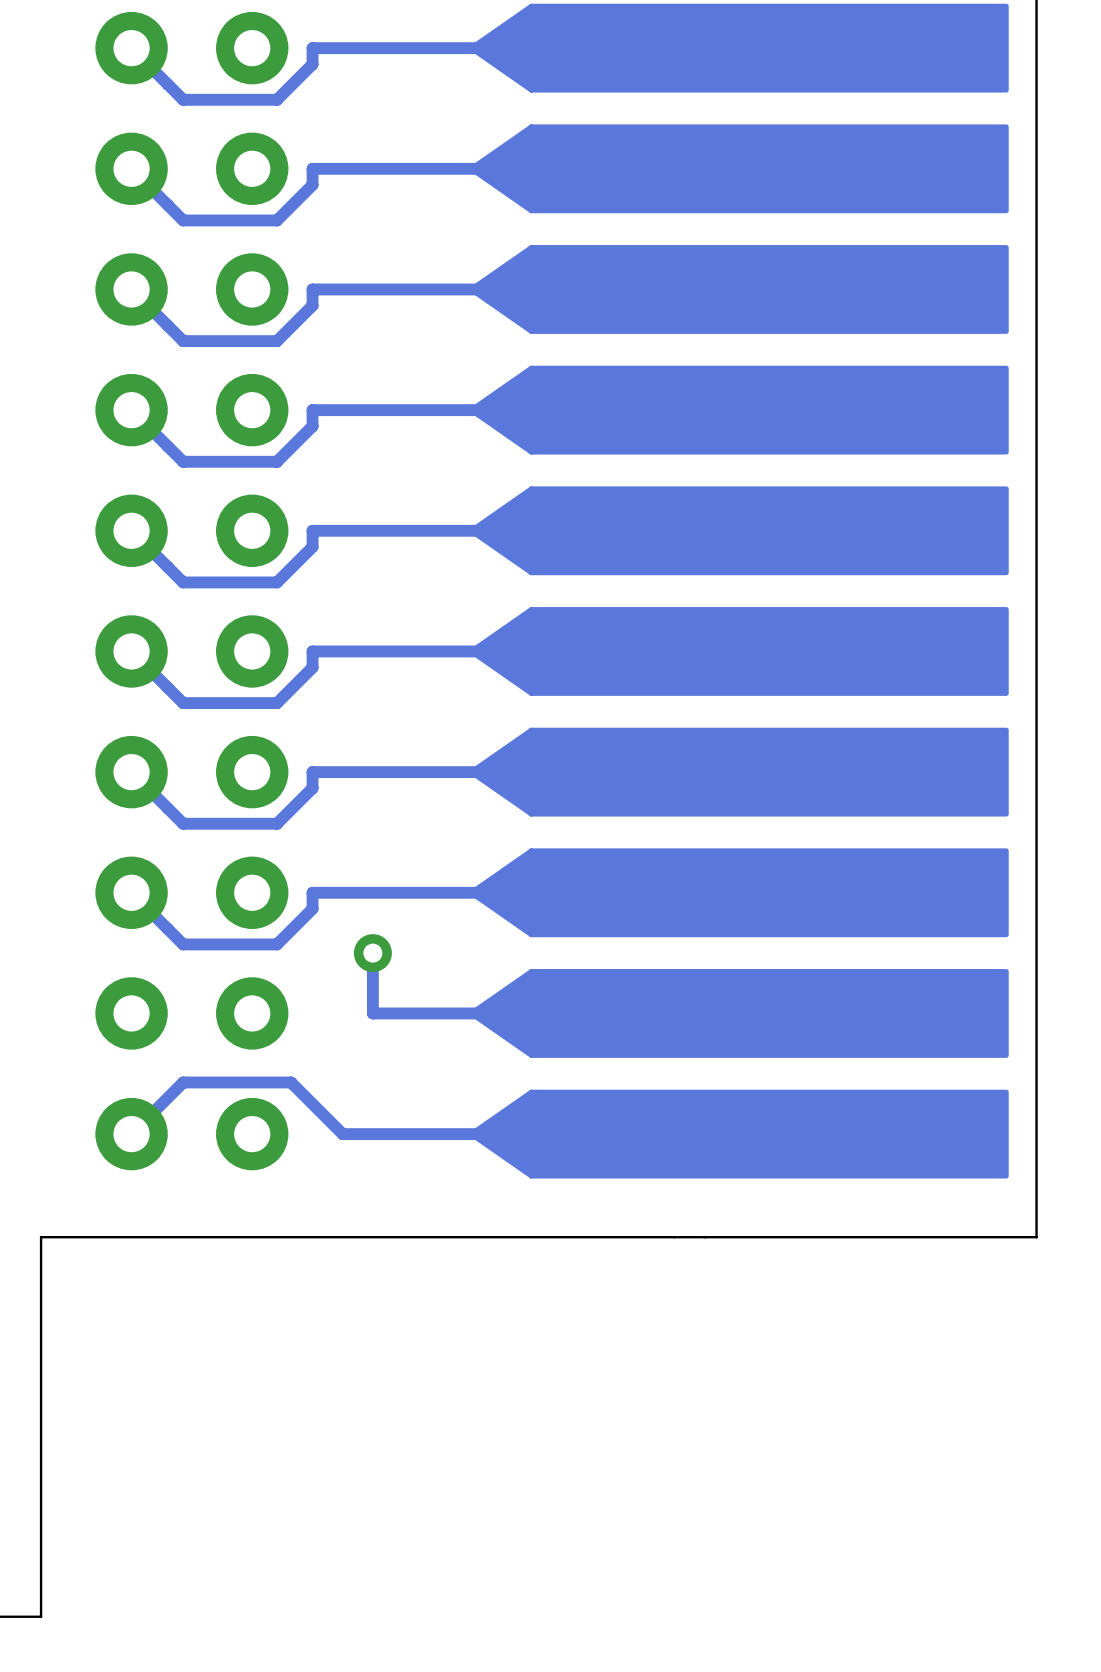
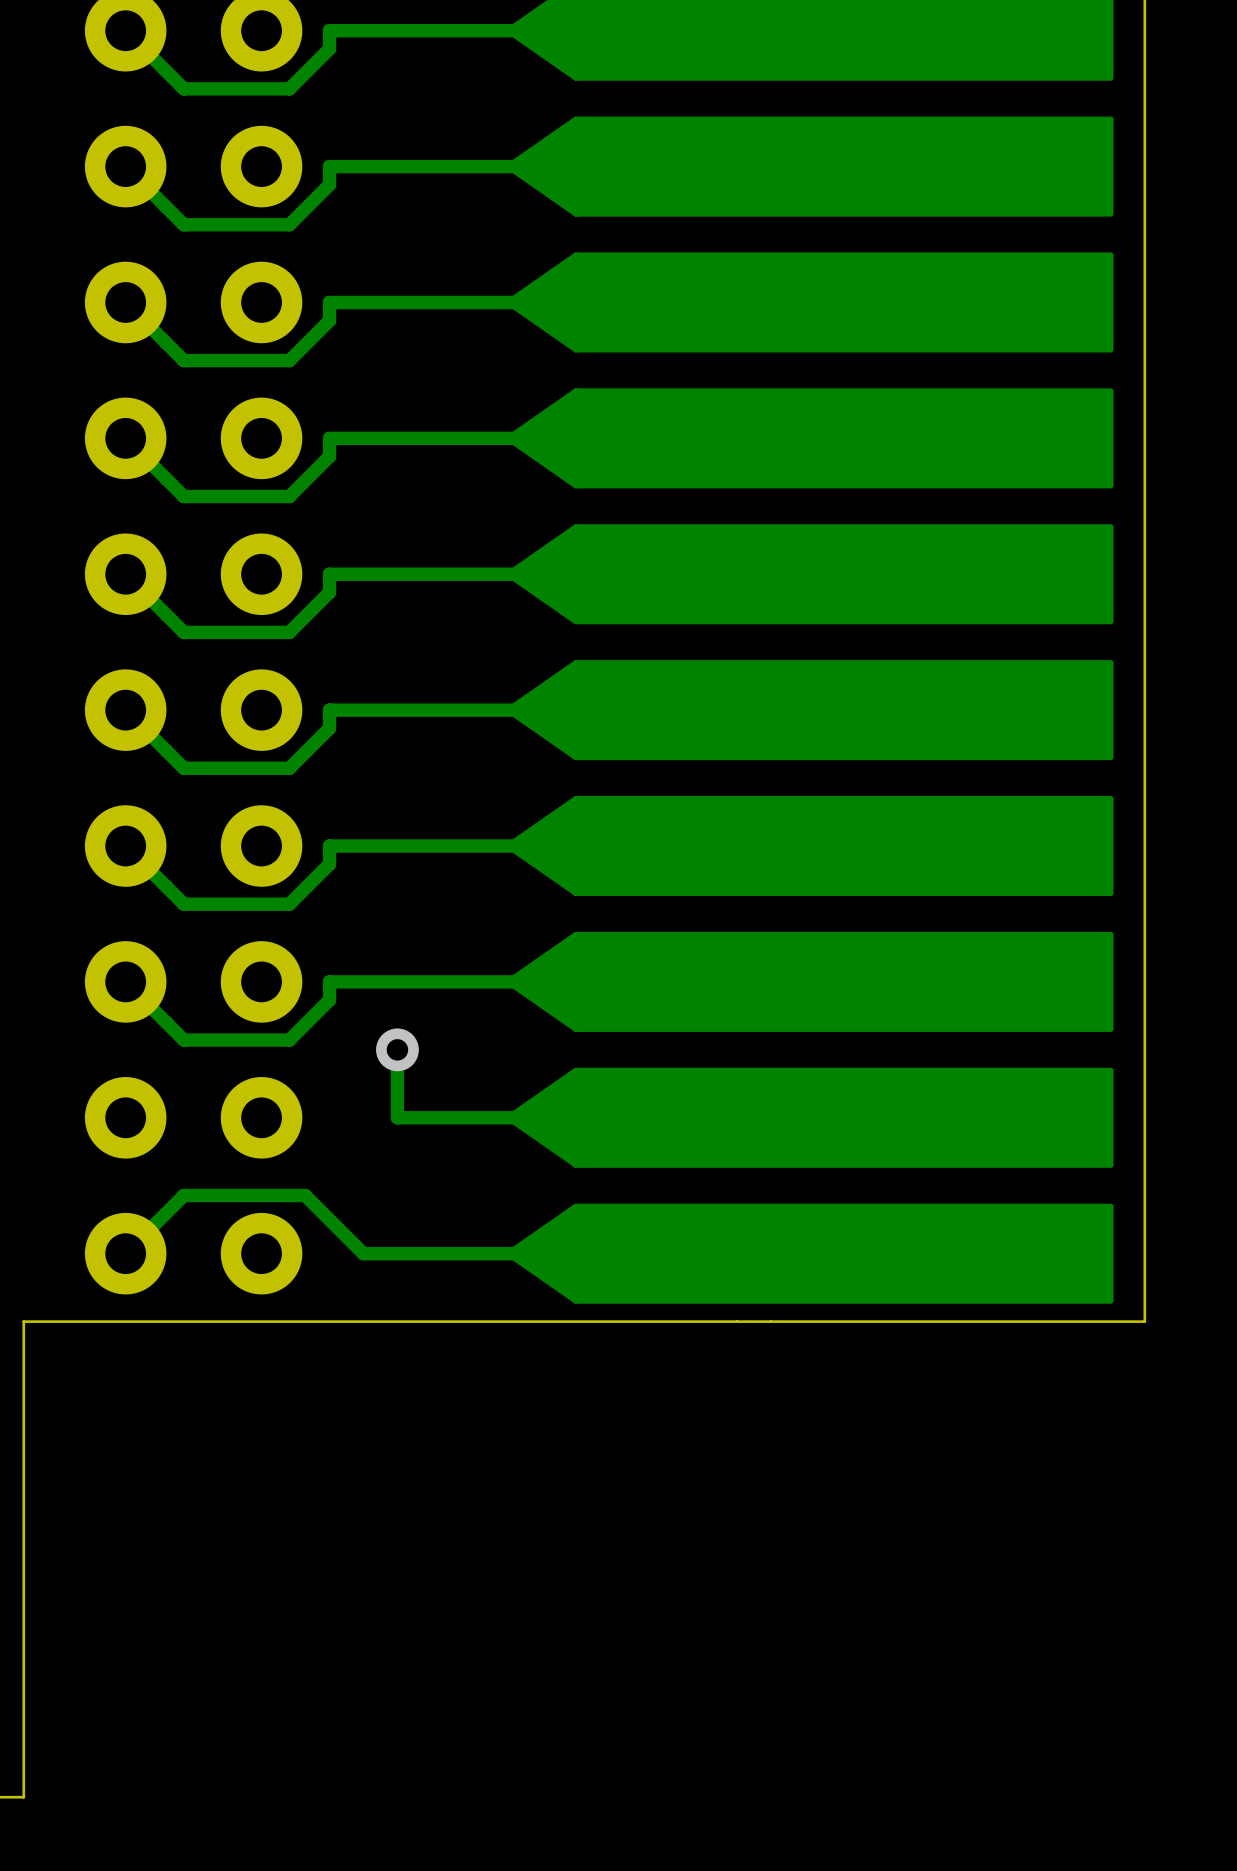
board edge: (1036, 1194) (1036, 1237) (41, 1237) -> (1144, 1321) (23, 1321) (23, 1369)

